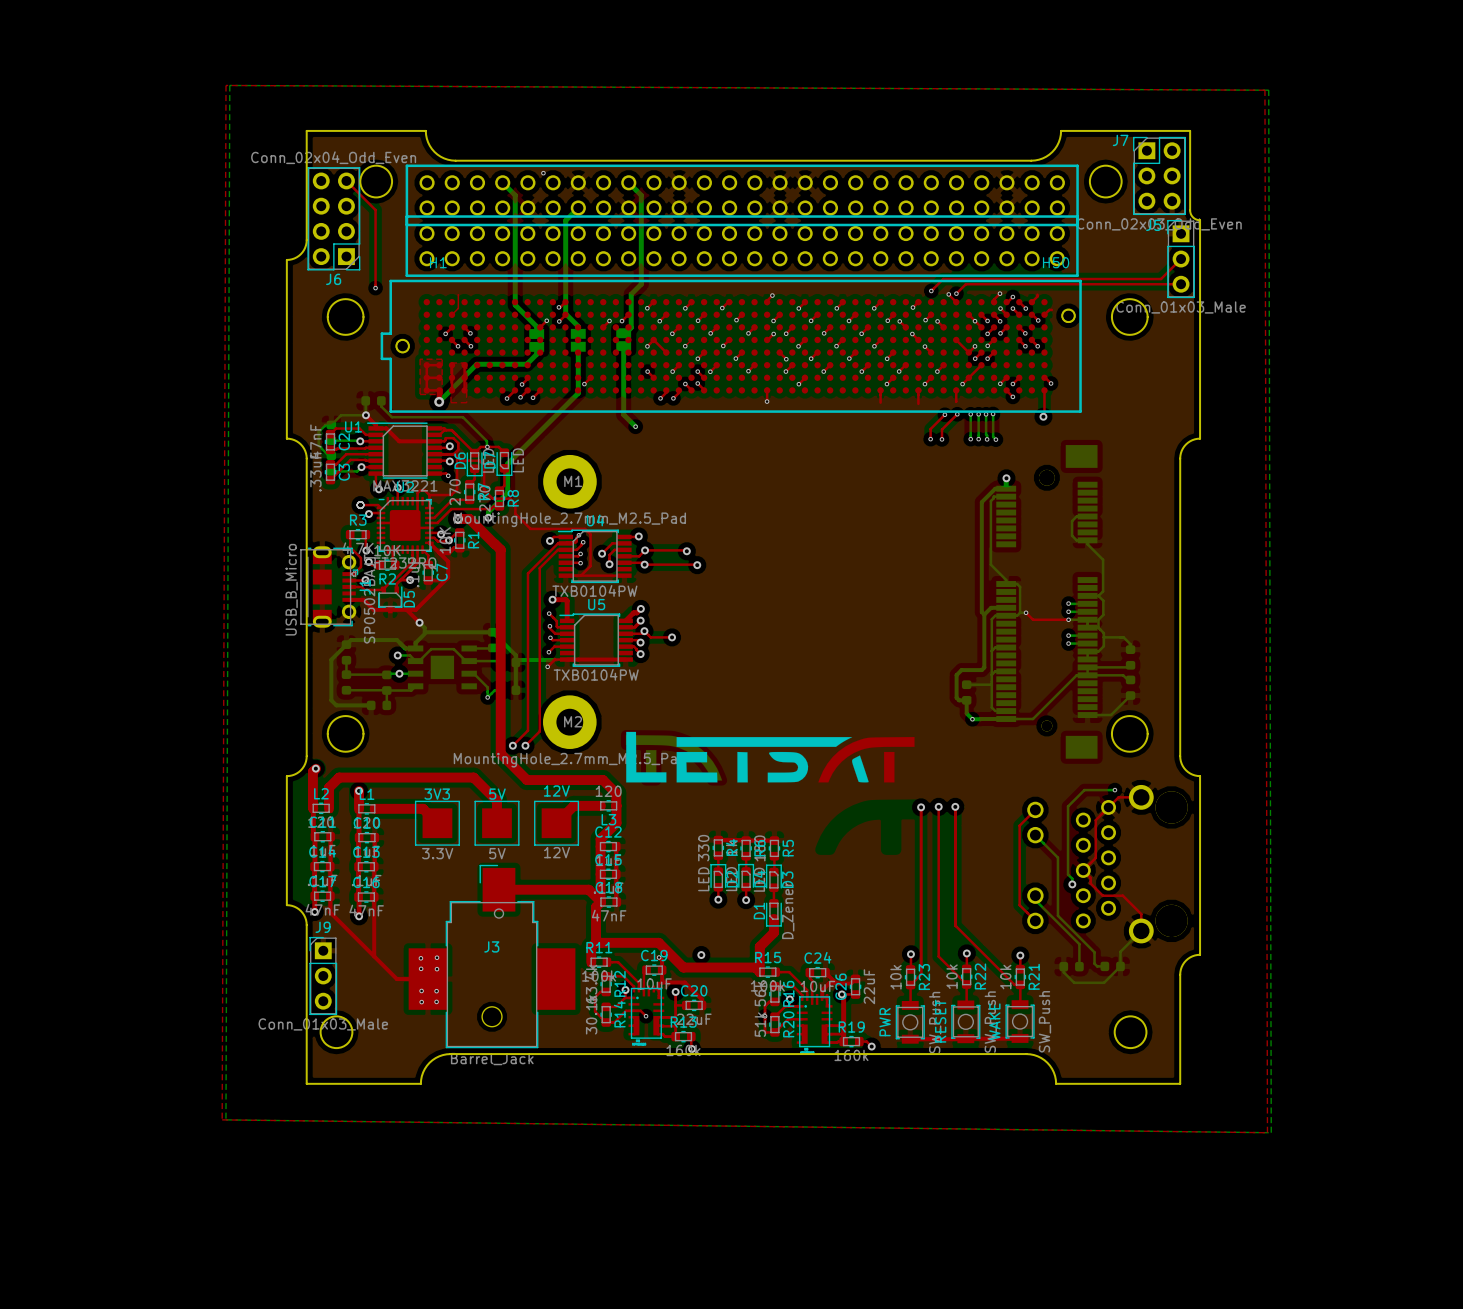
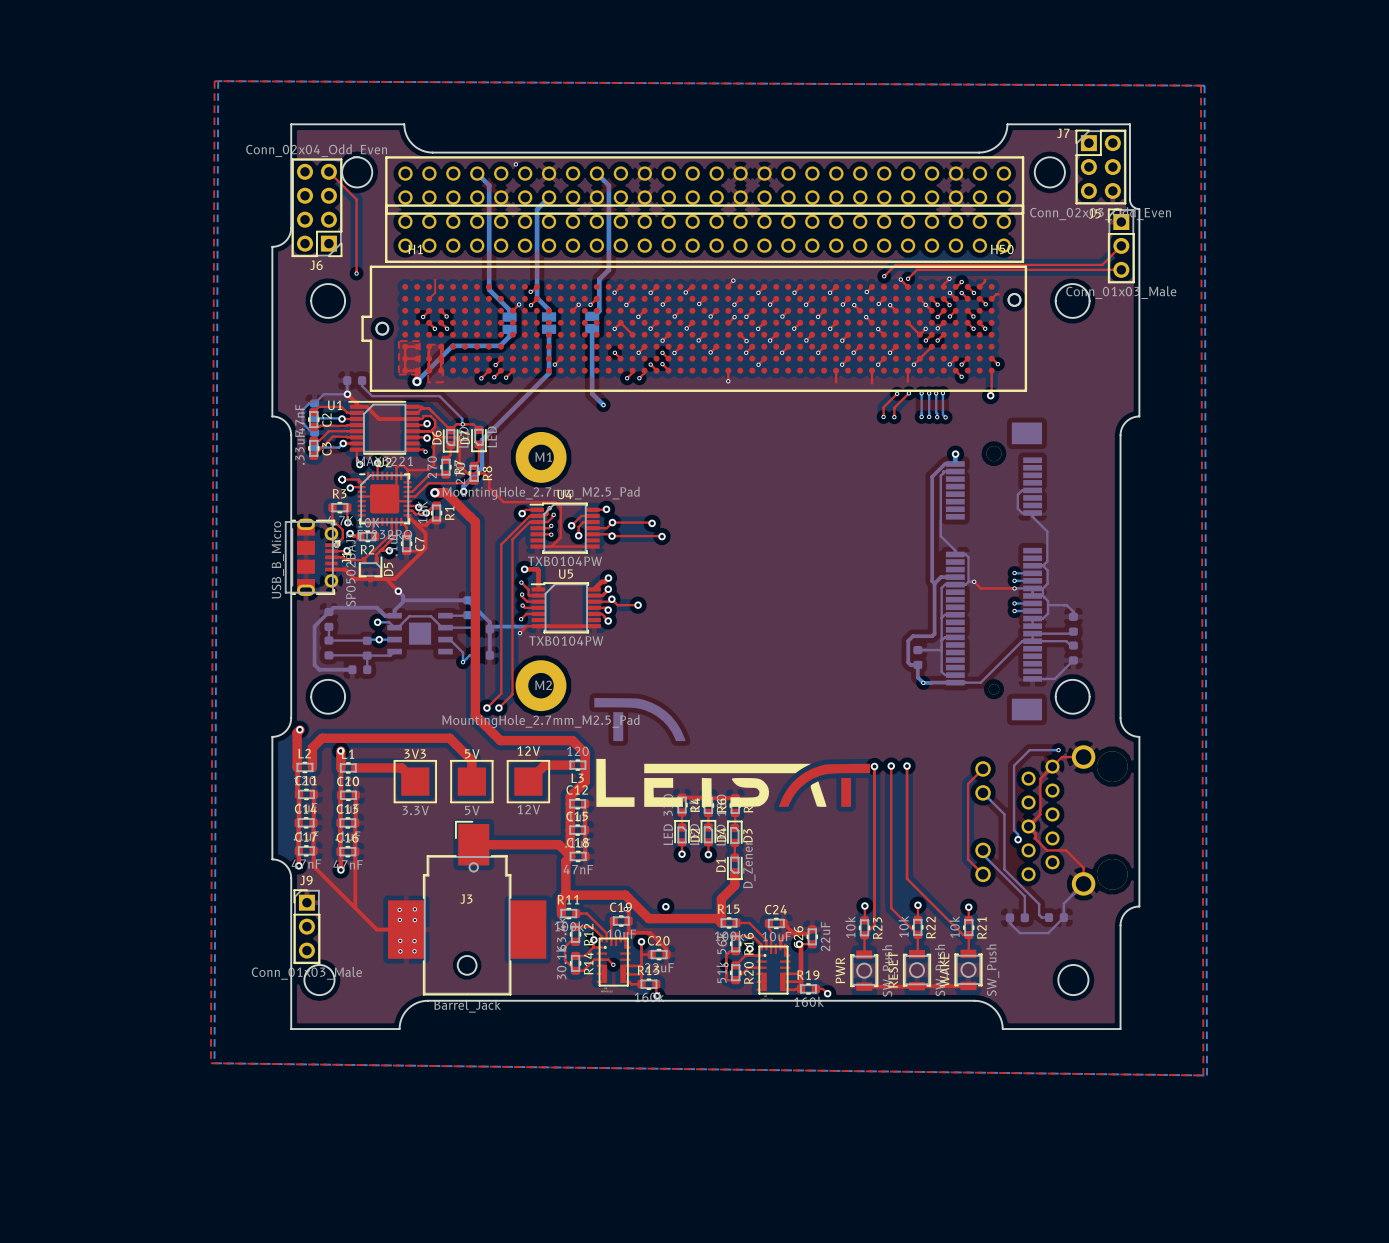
drawing position: (770, 757) -> (733, 782)

